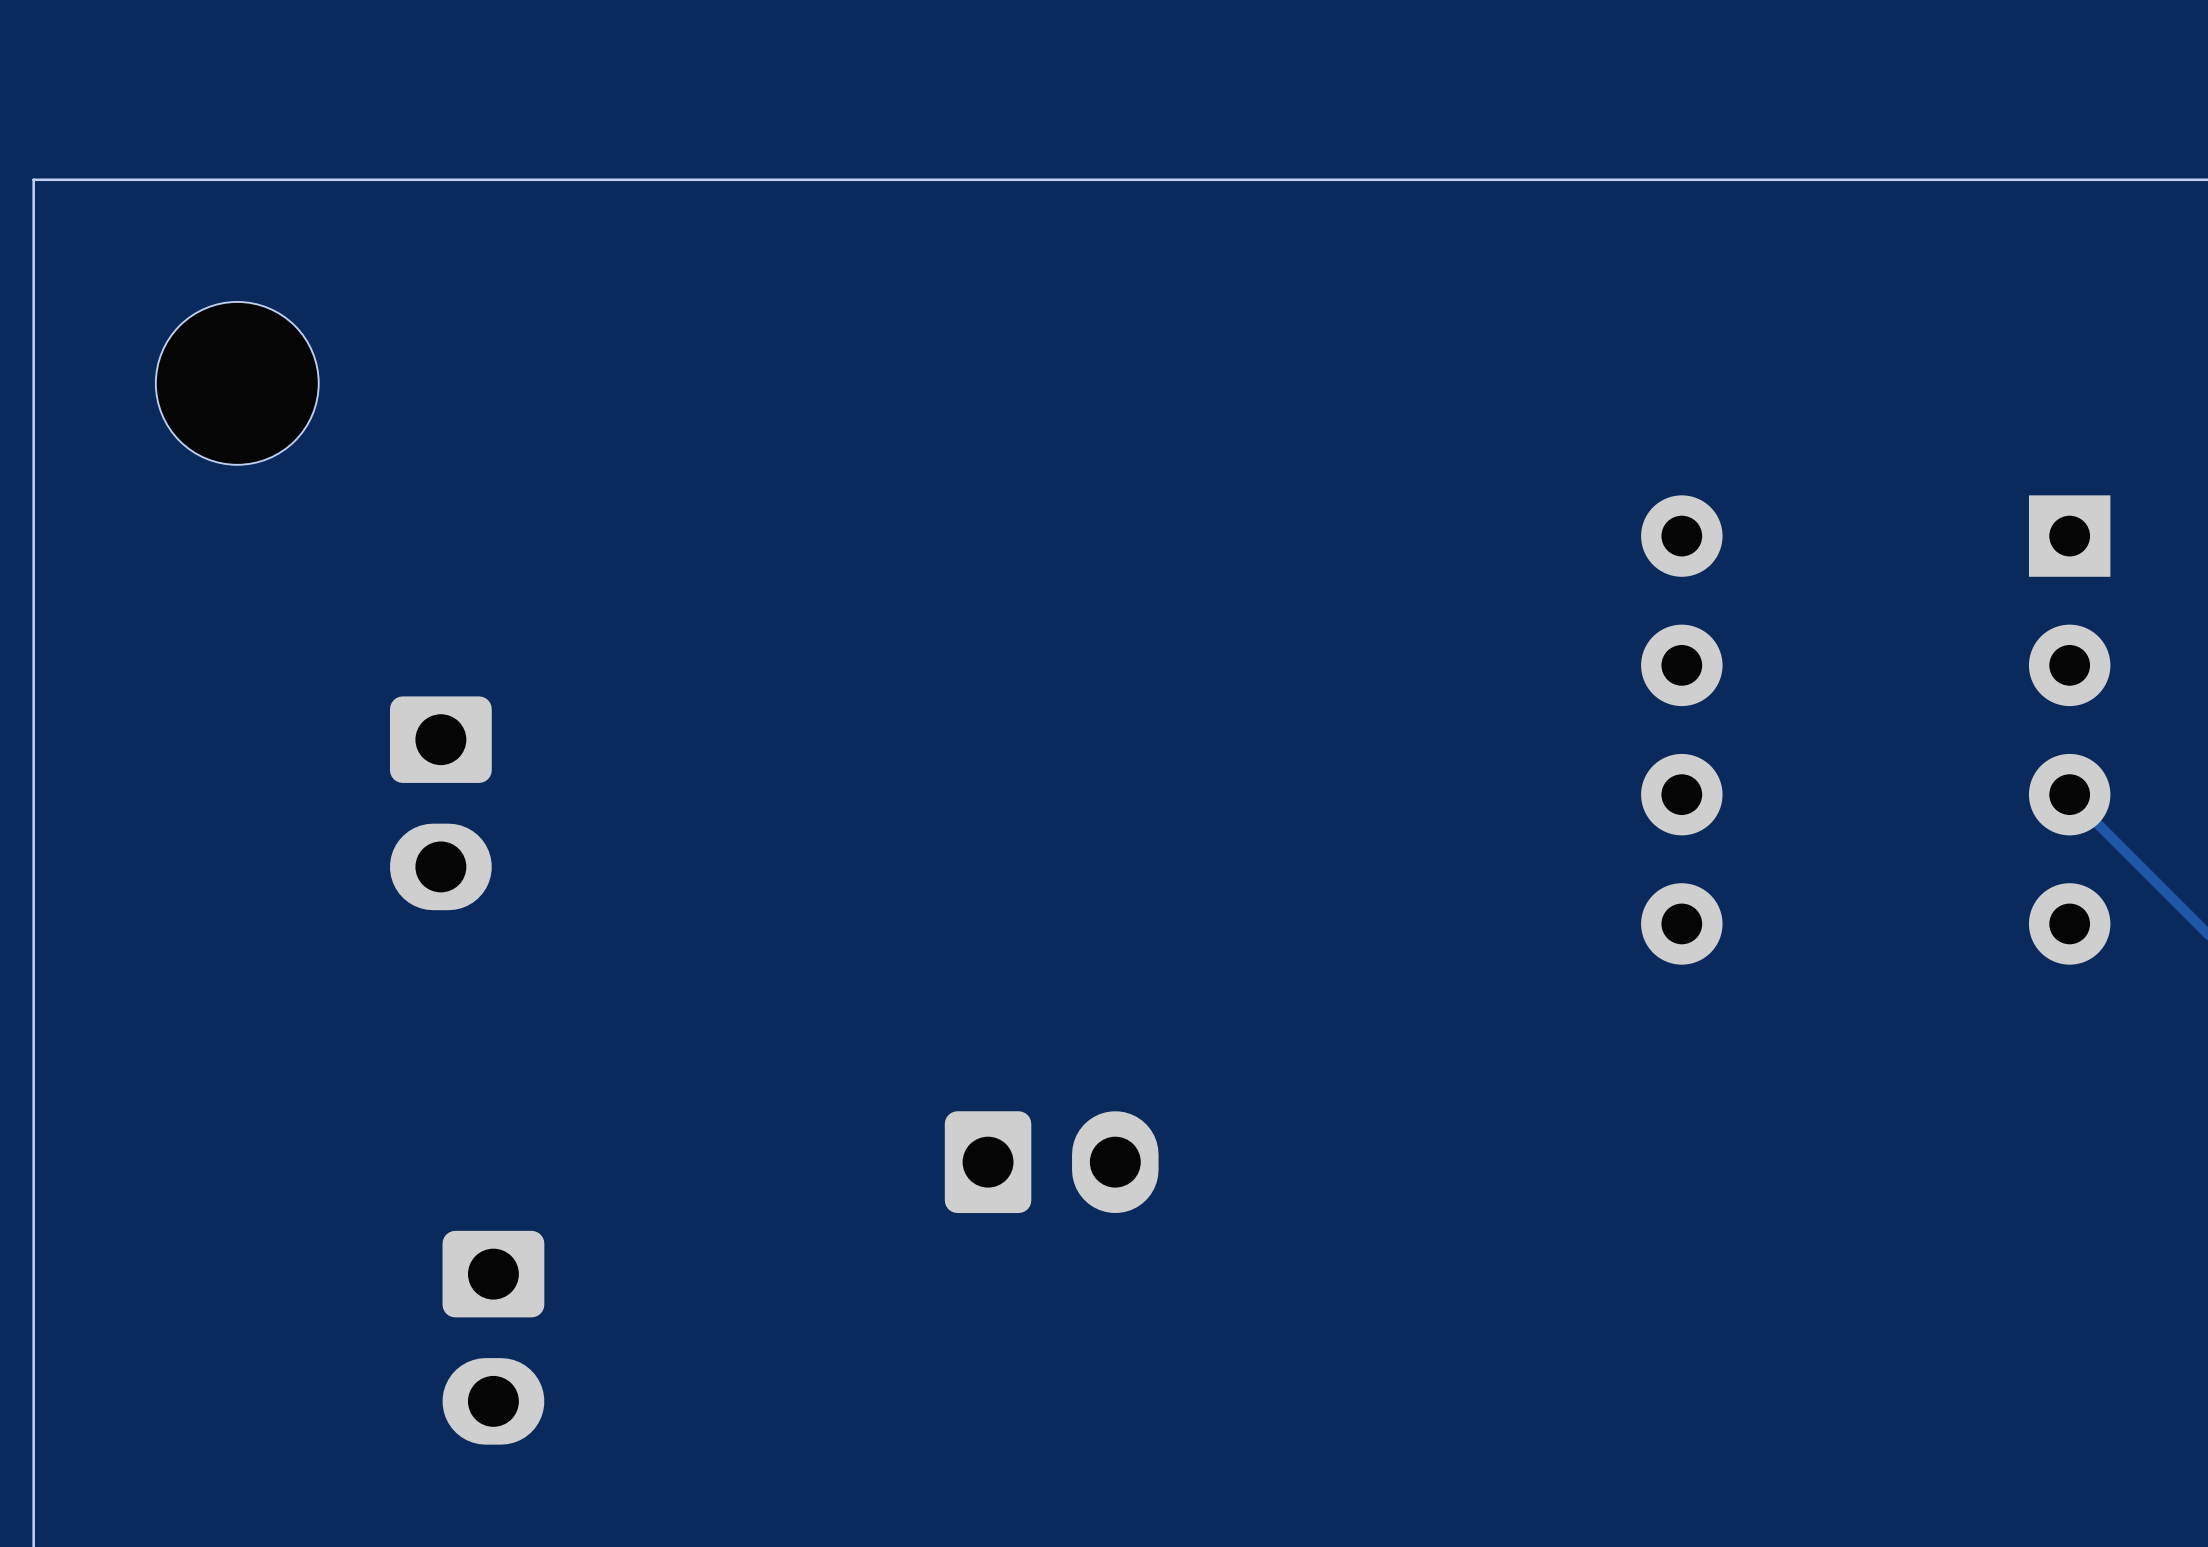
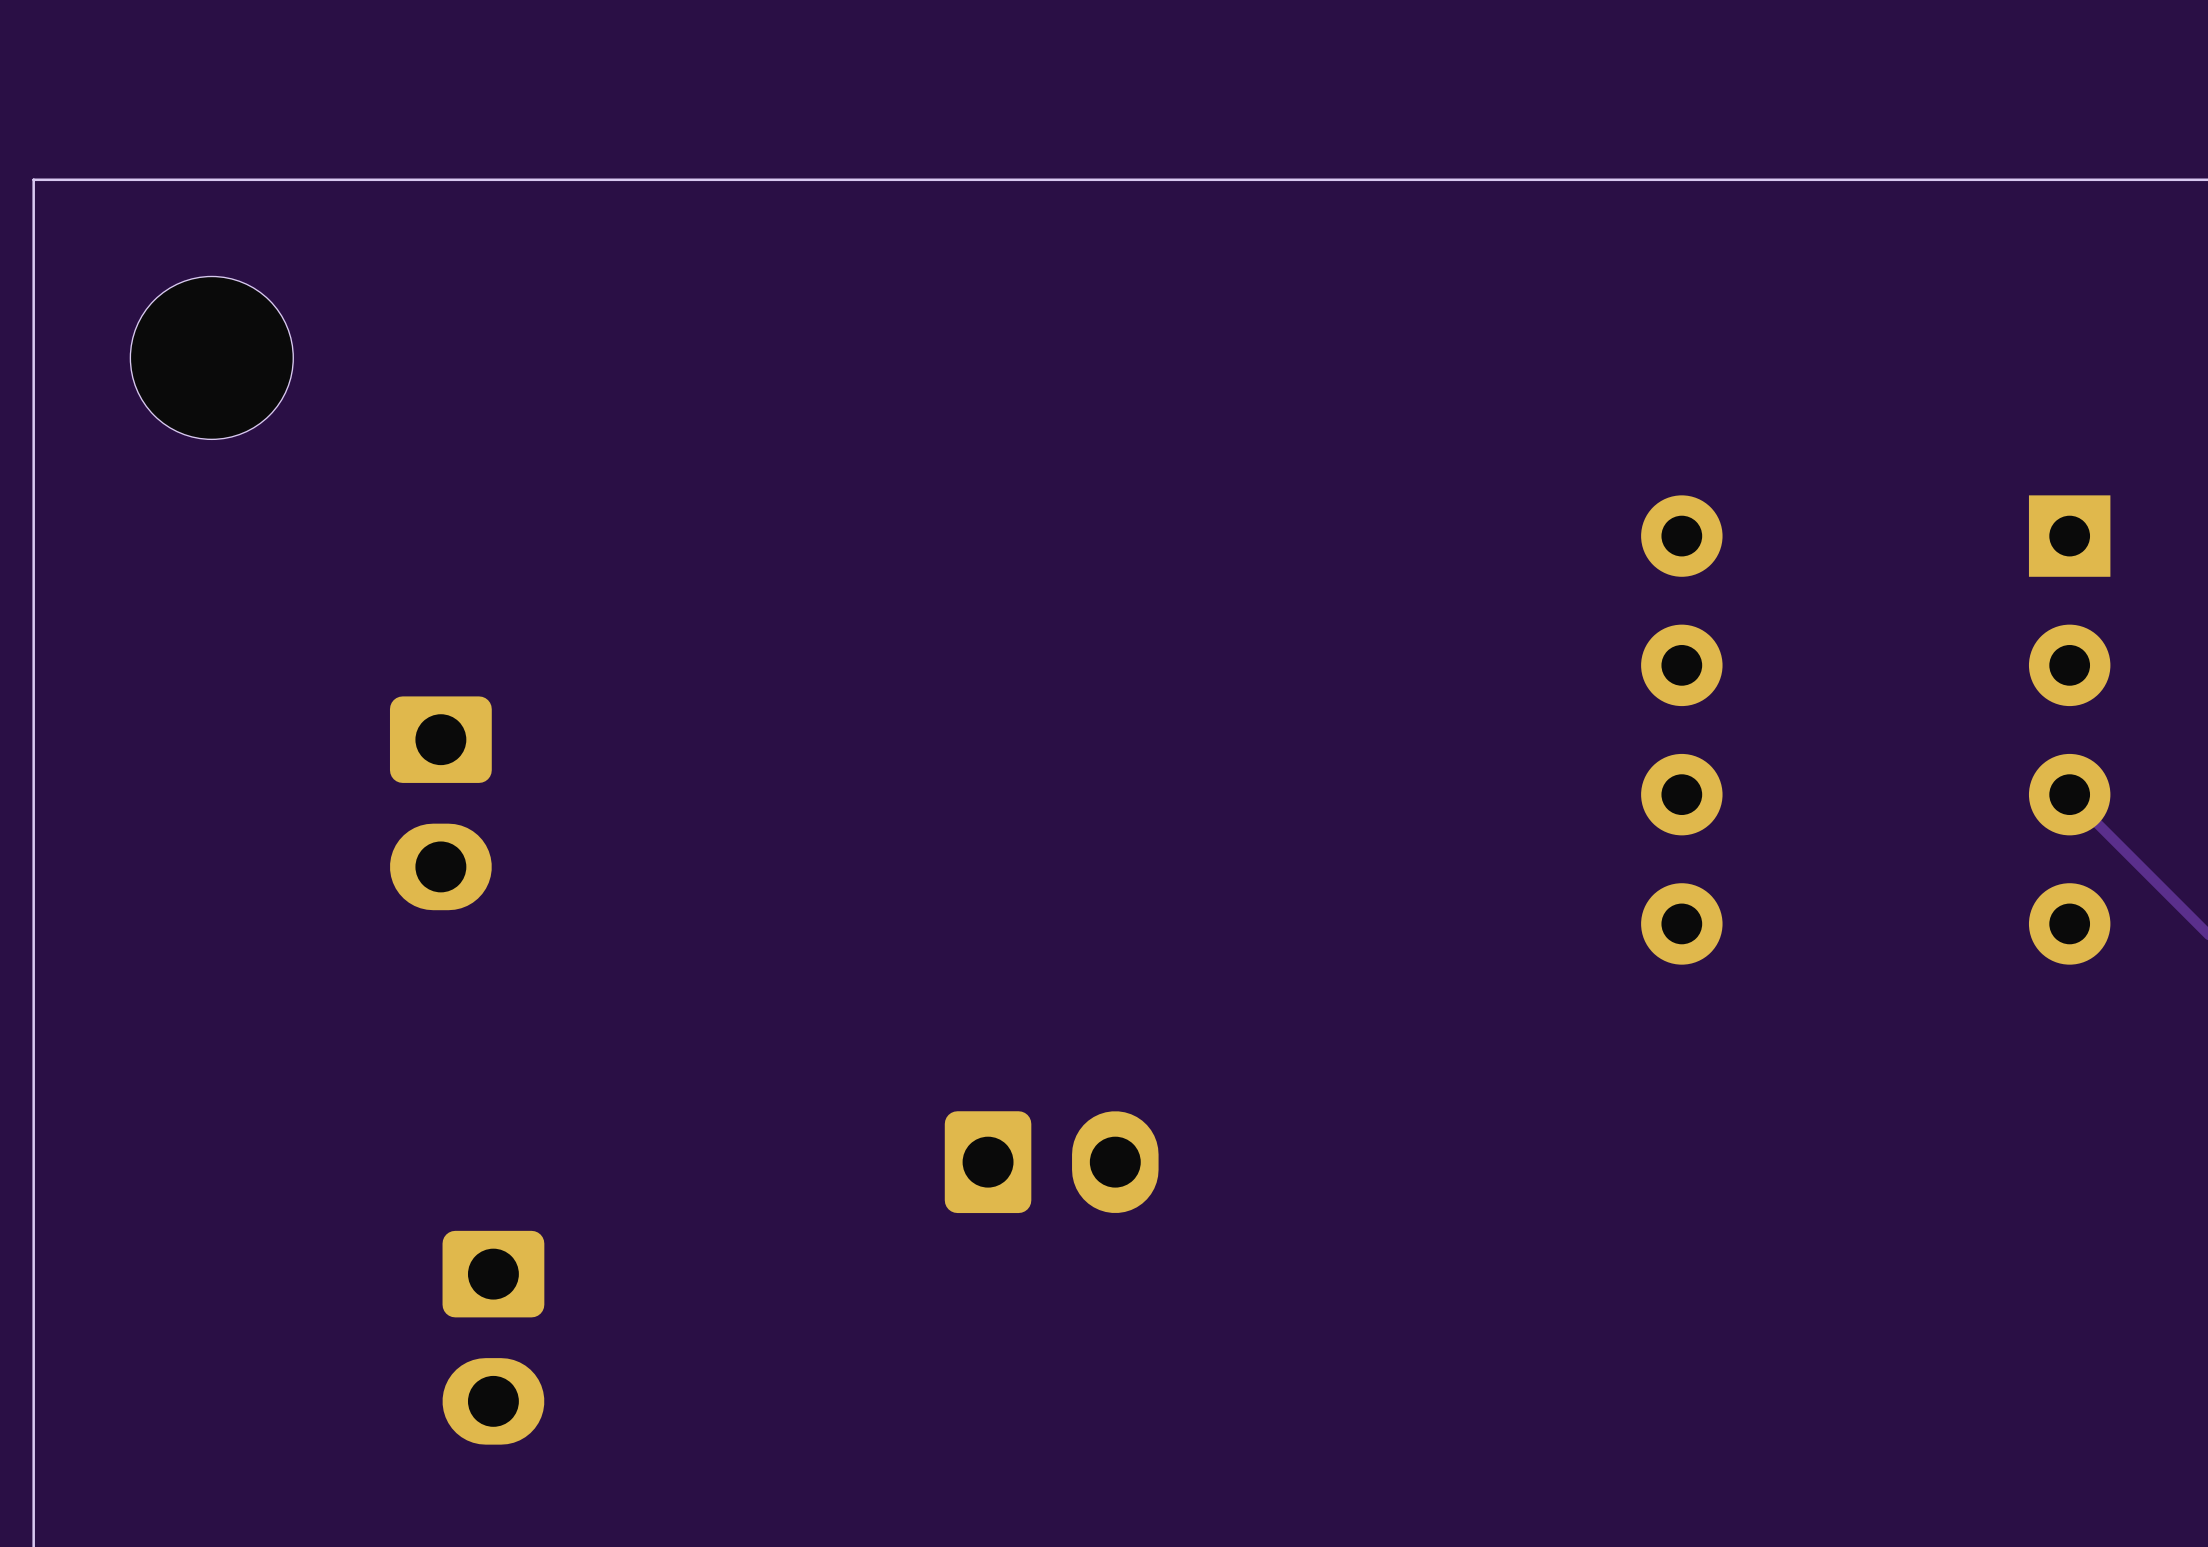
part position: (237, 383) -> (211, 357)

